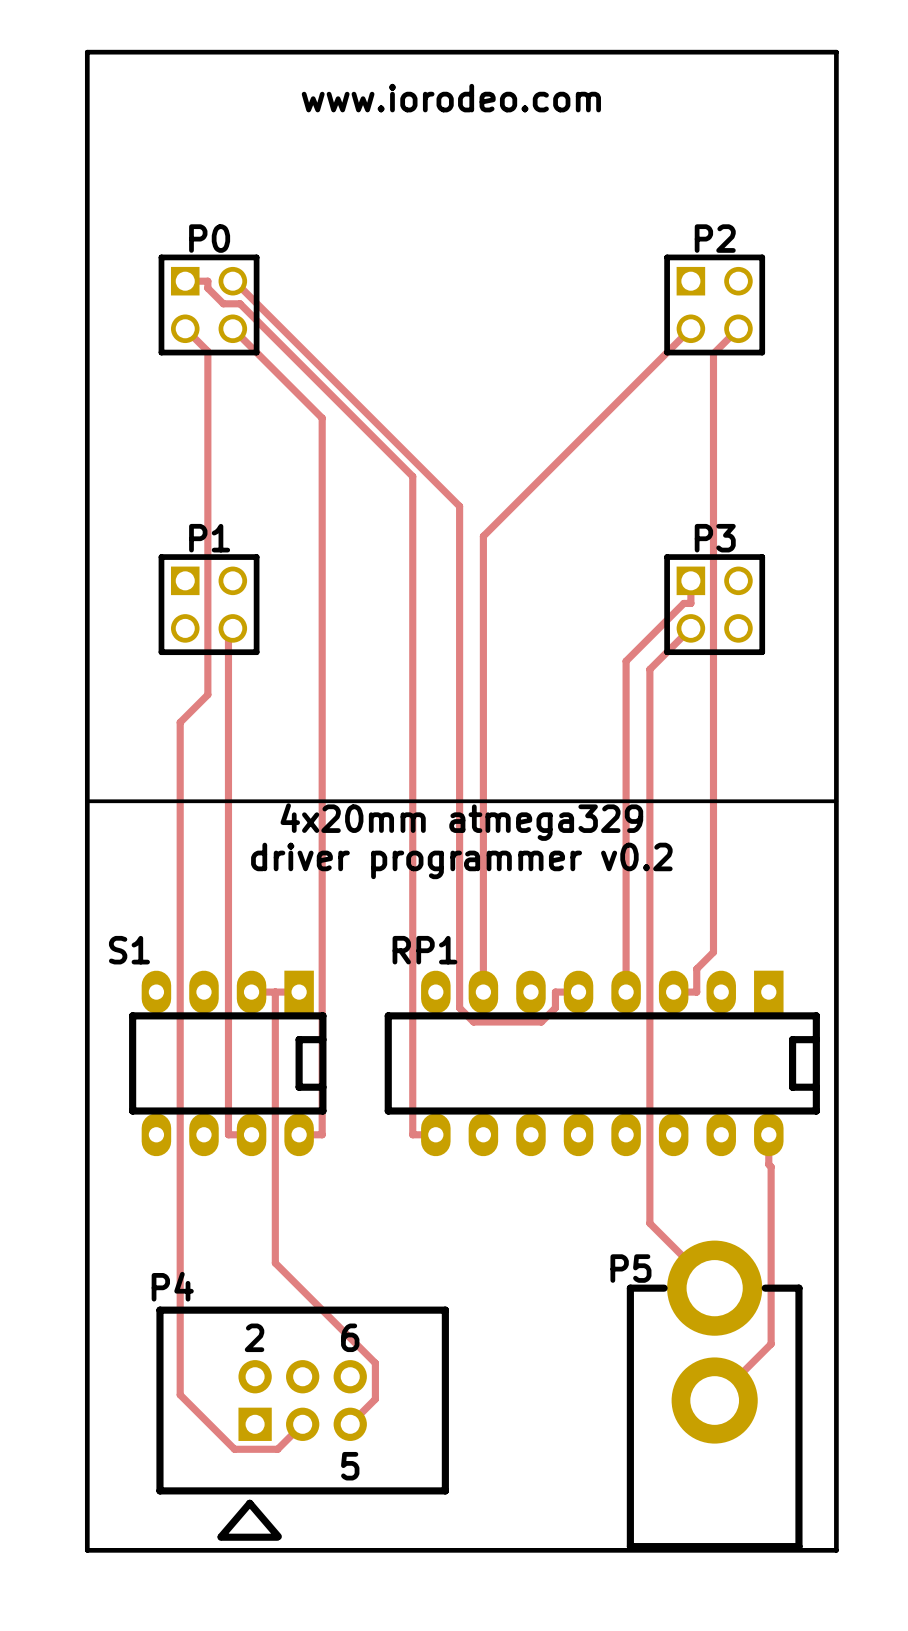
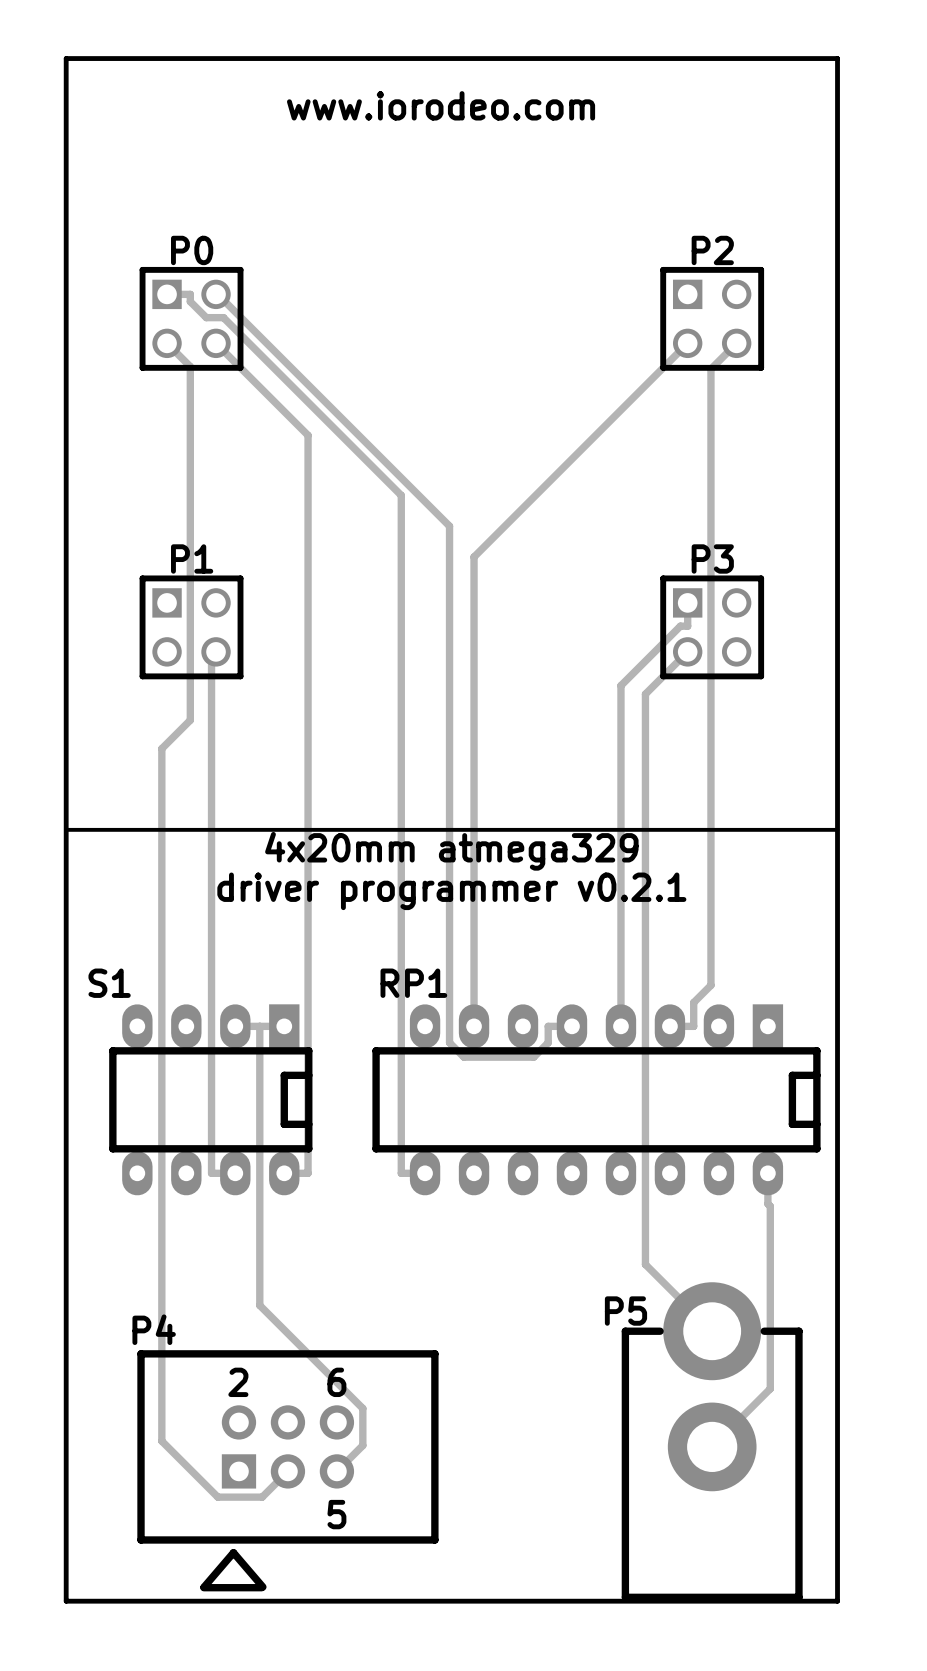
text: driver programmer v0.2 (461, 860) -> driver programmer v0.2.1 (451, 891)

